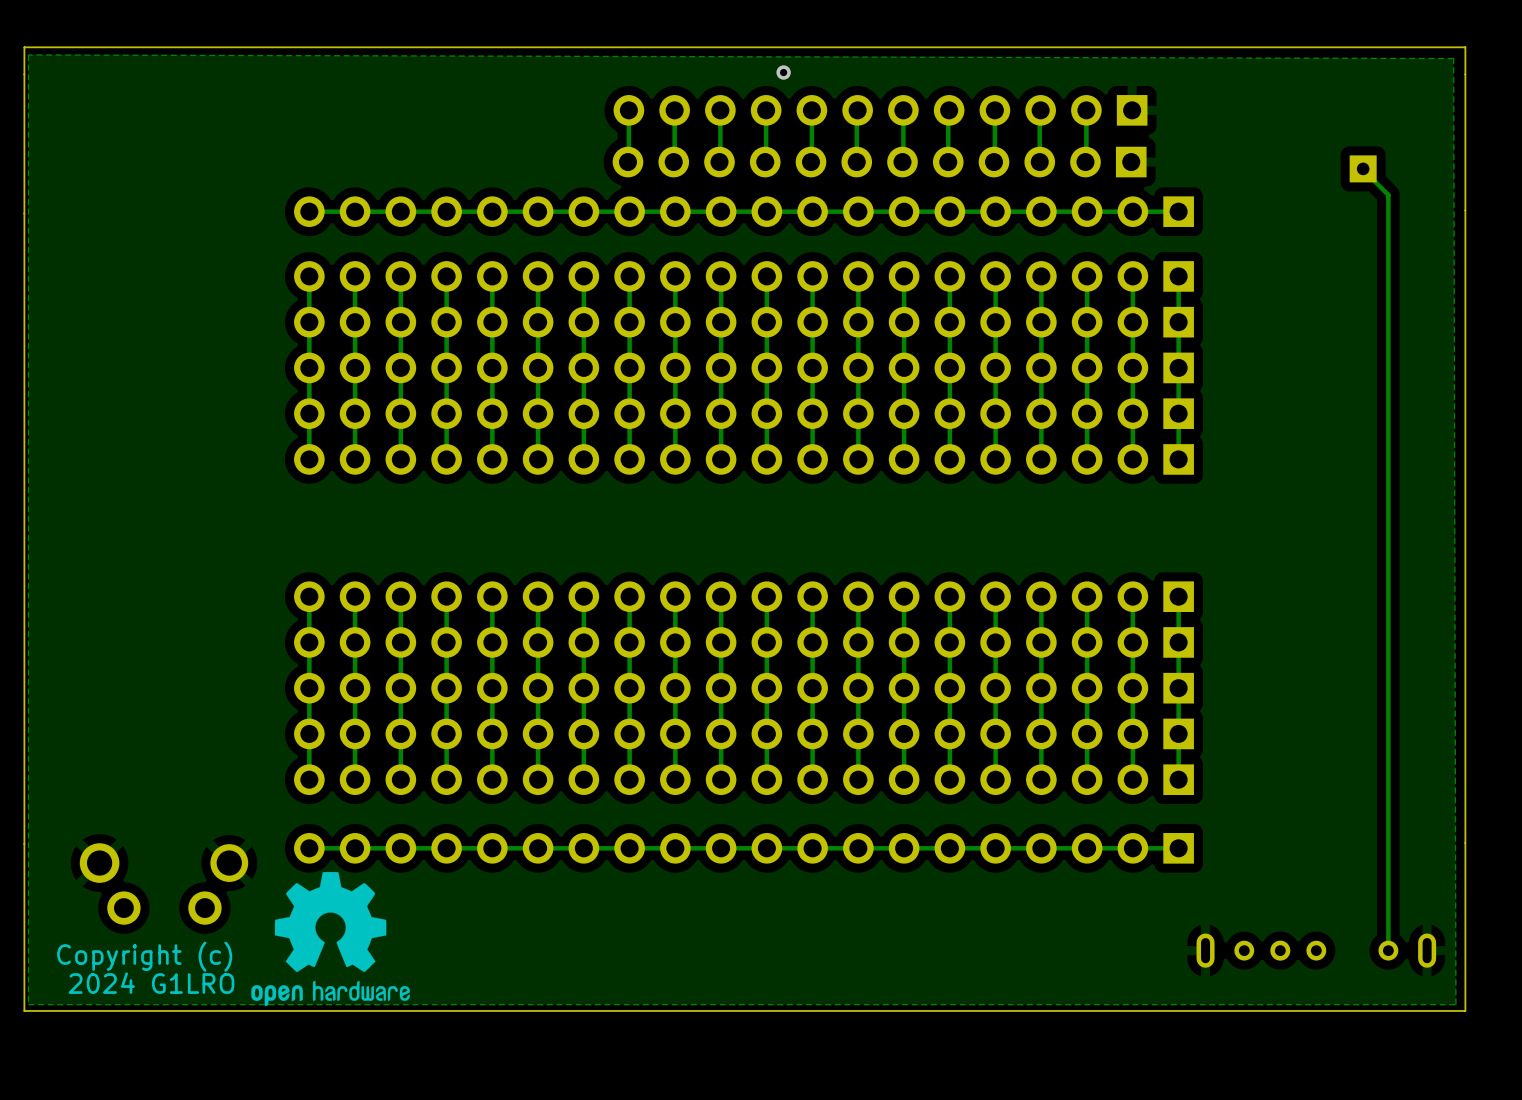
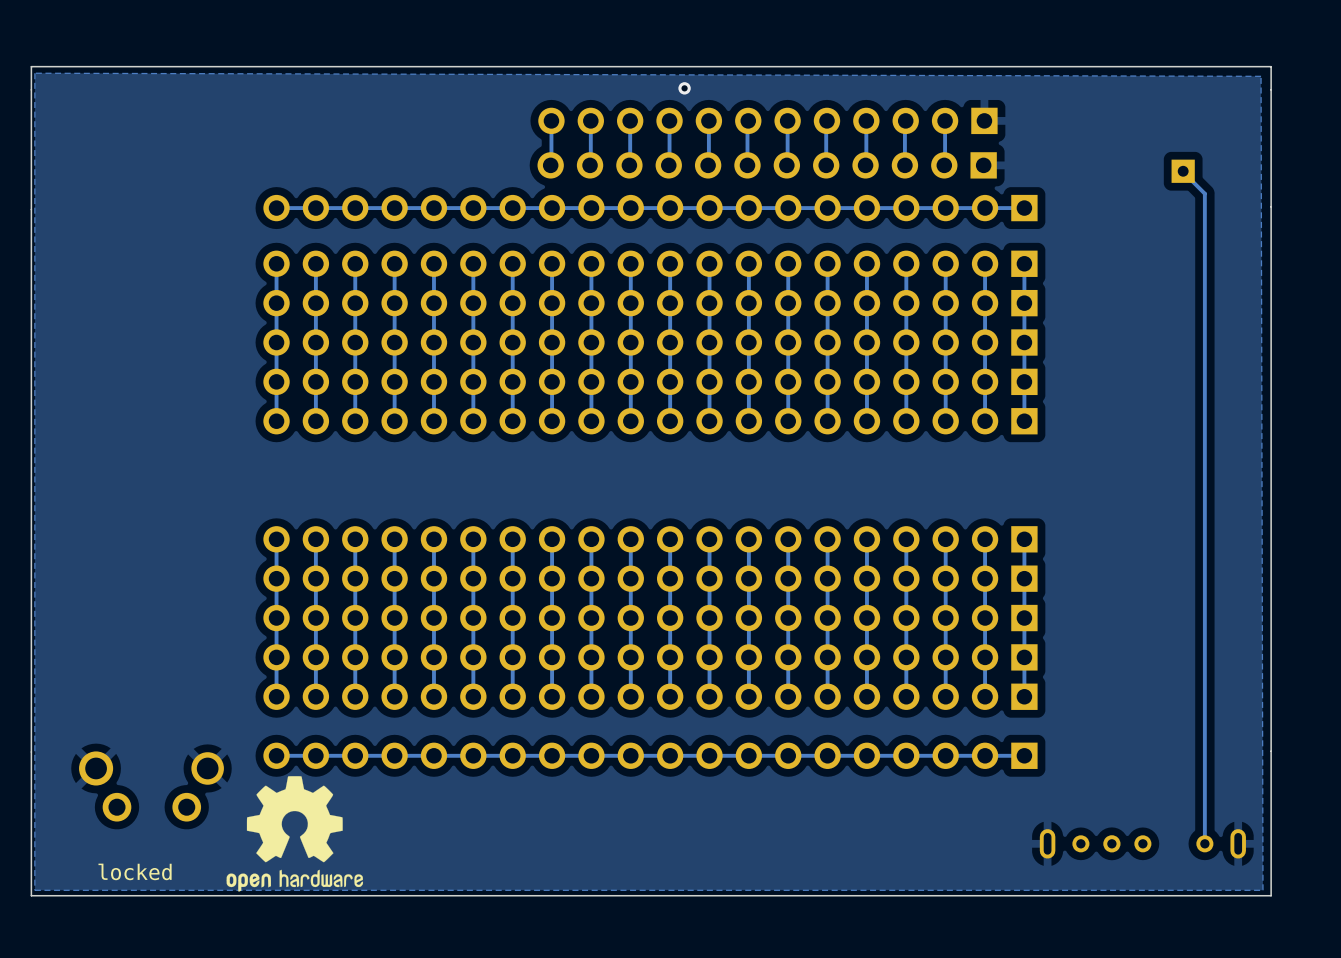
text: Copyright (c) (144, 956) -> none
text: 2024 G1LRO (151, 983) -> locked (135, 871)

